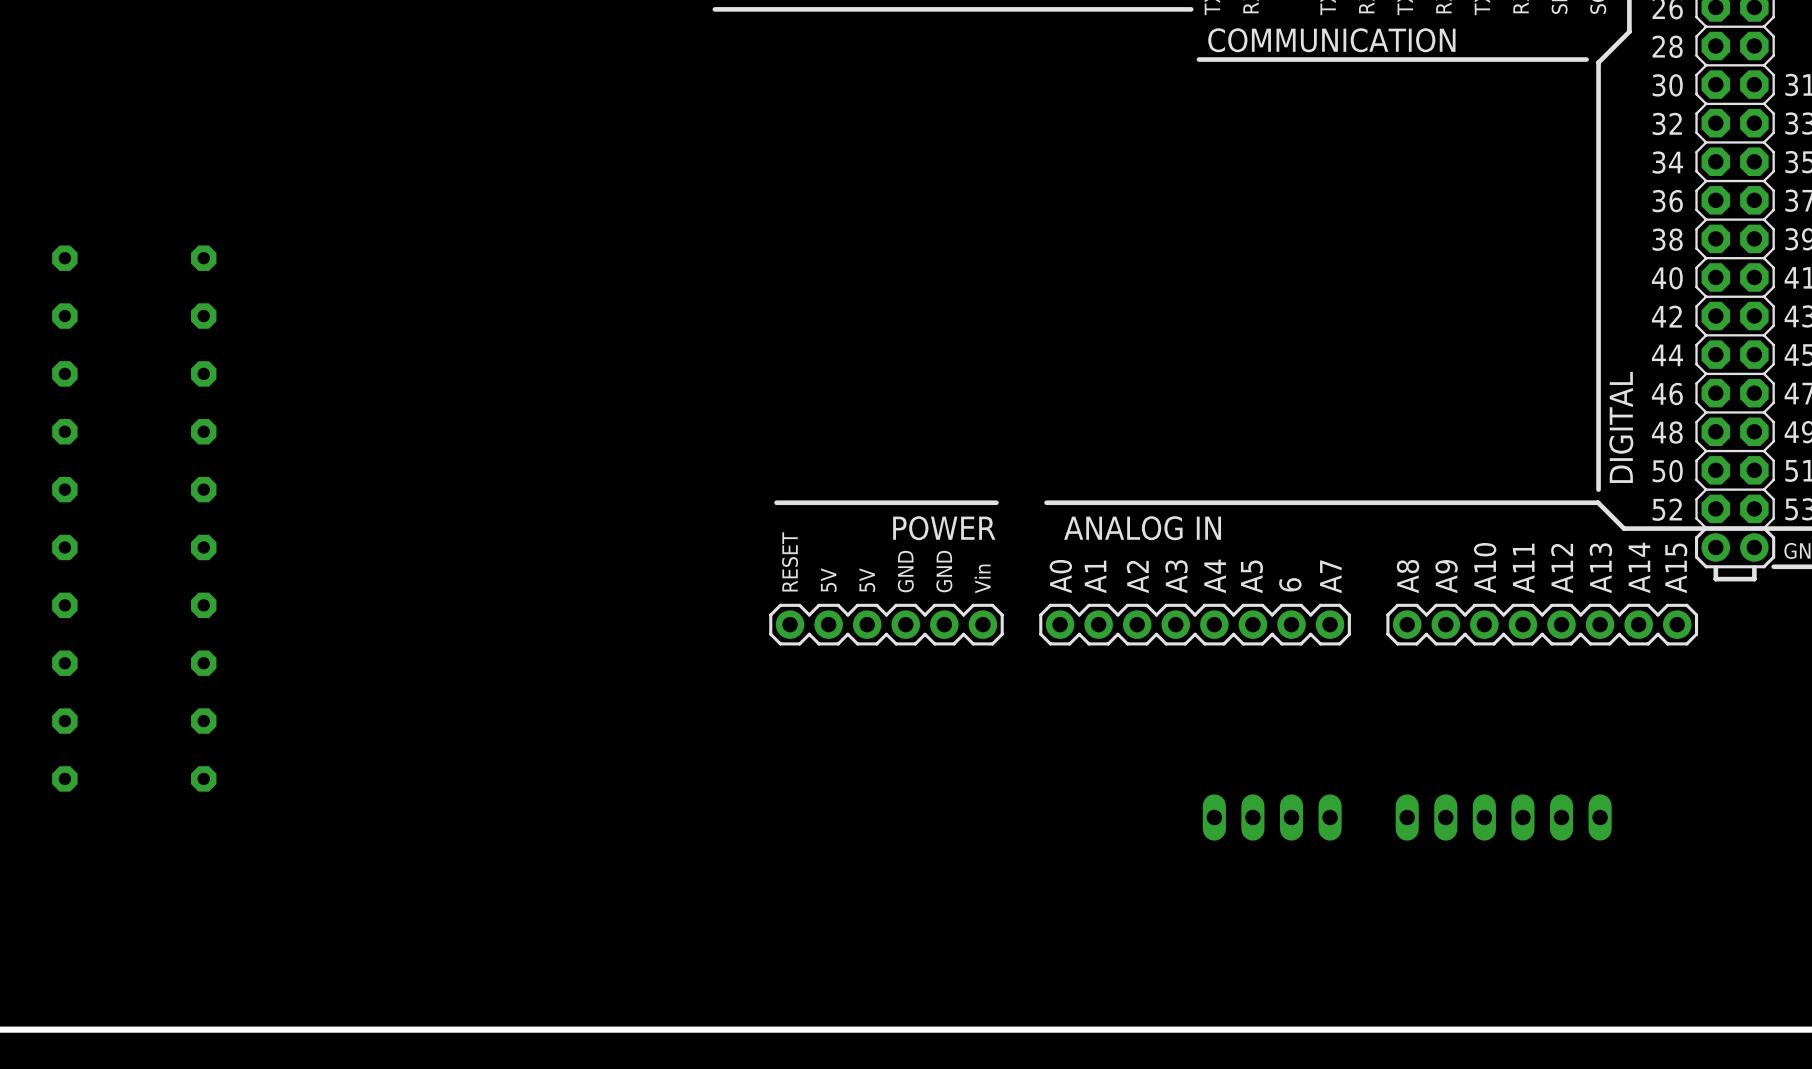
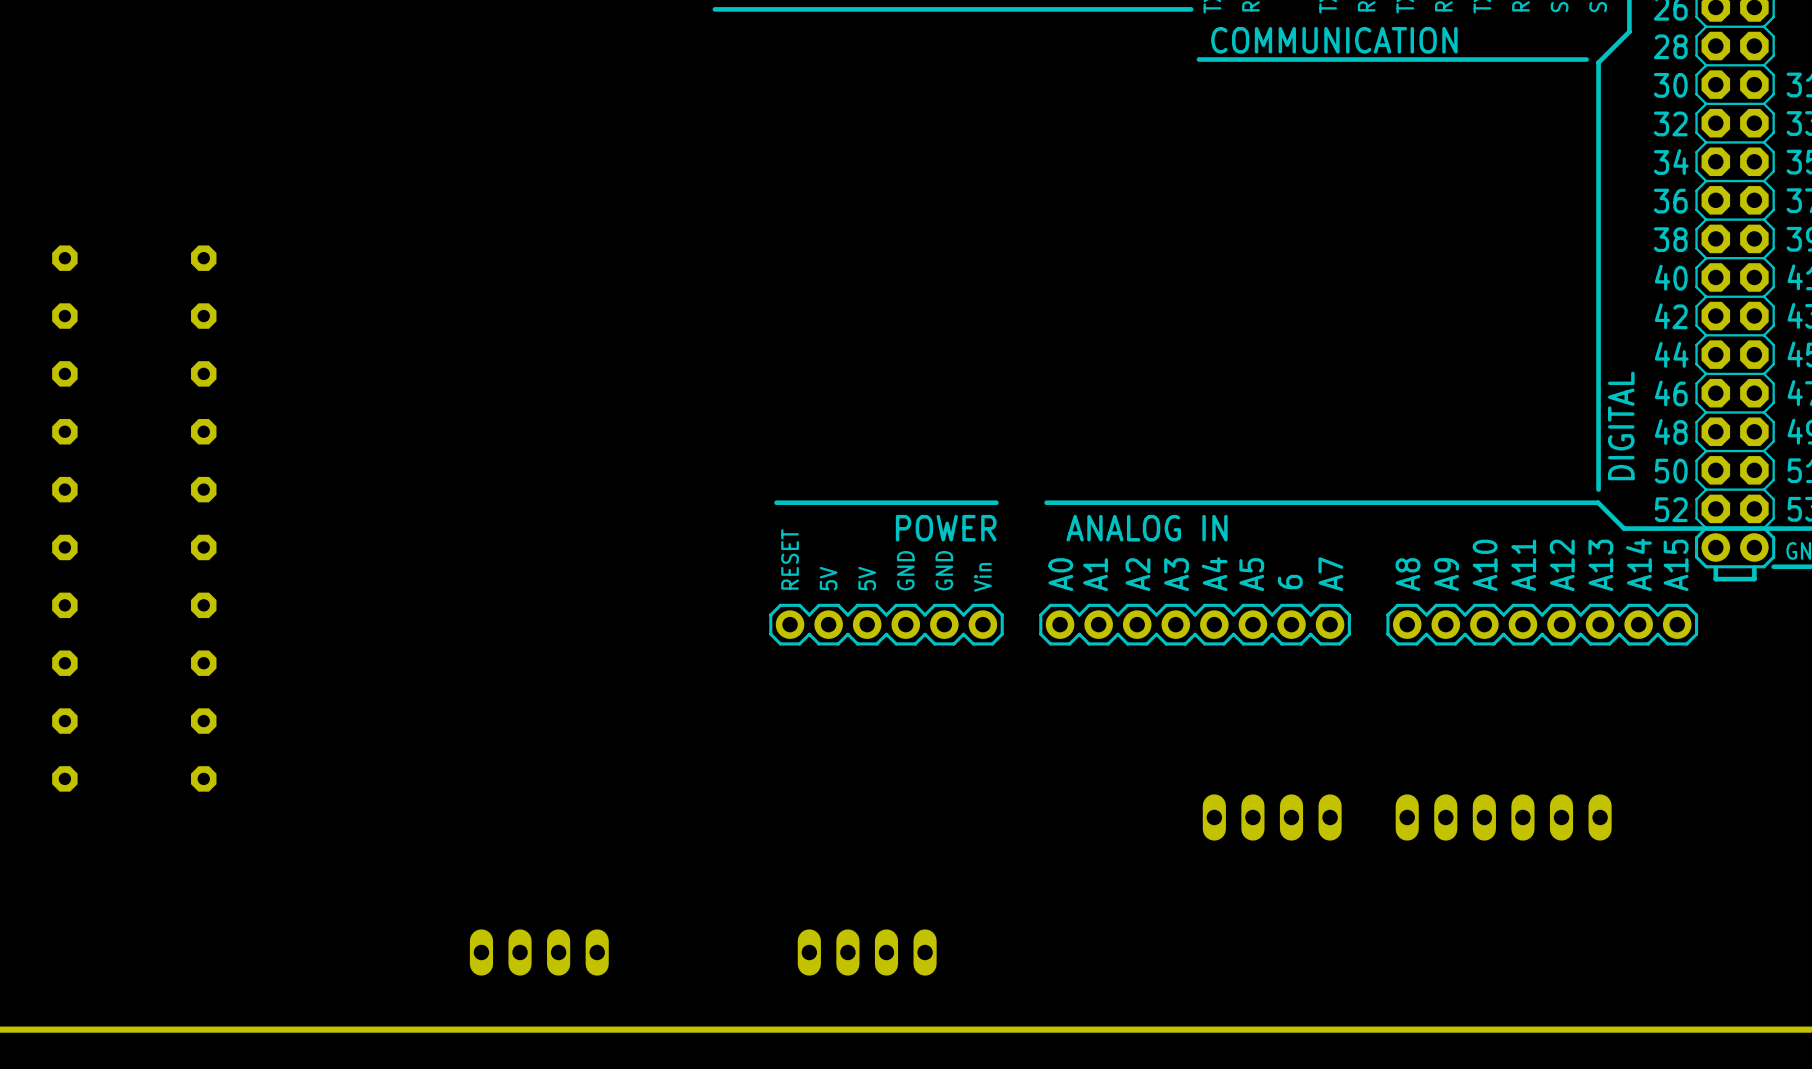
part: none -> (539, 952)
part: none -> (867, 952)

